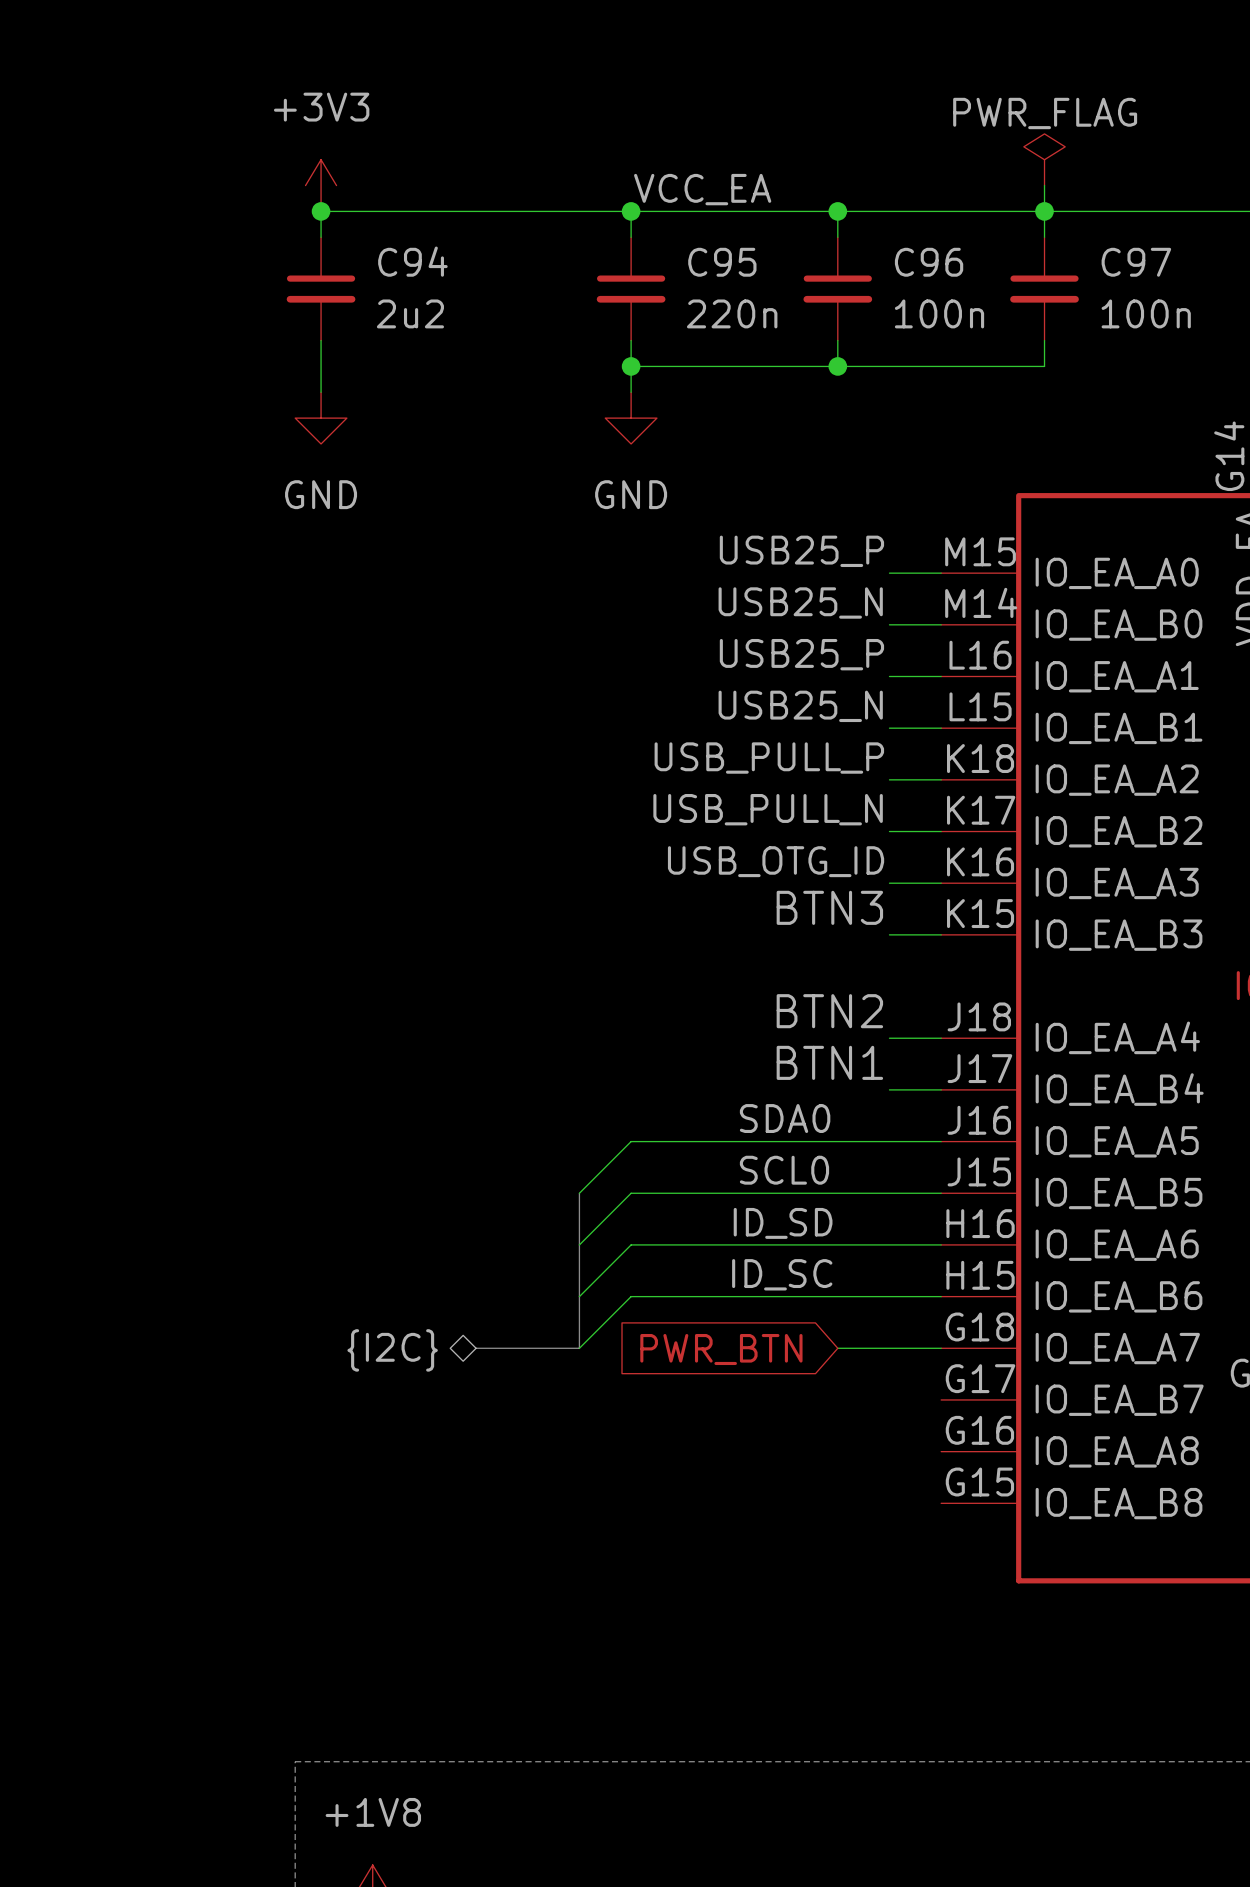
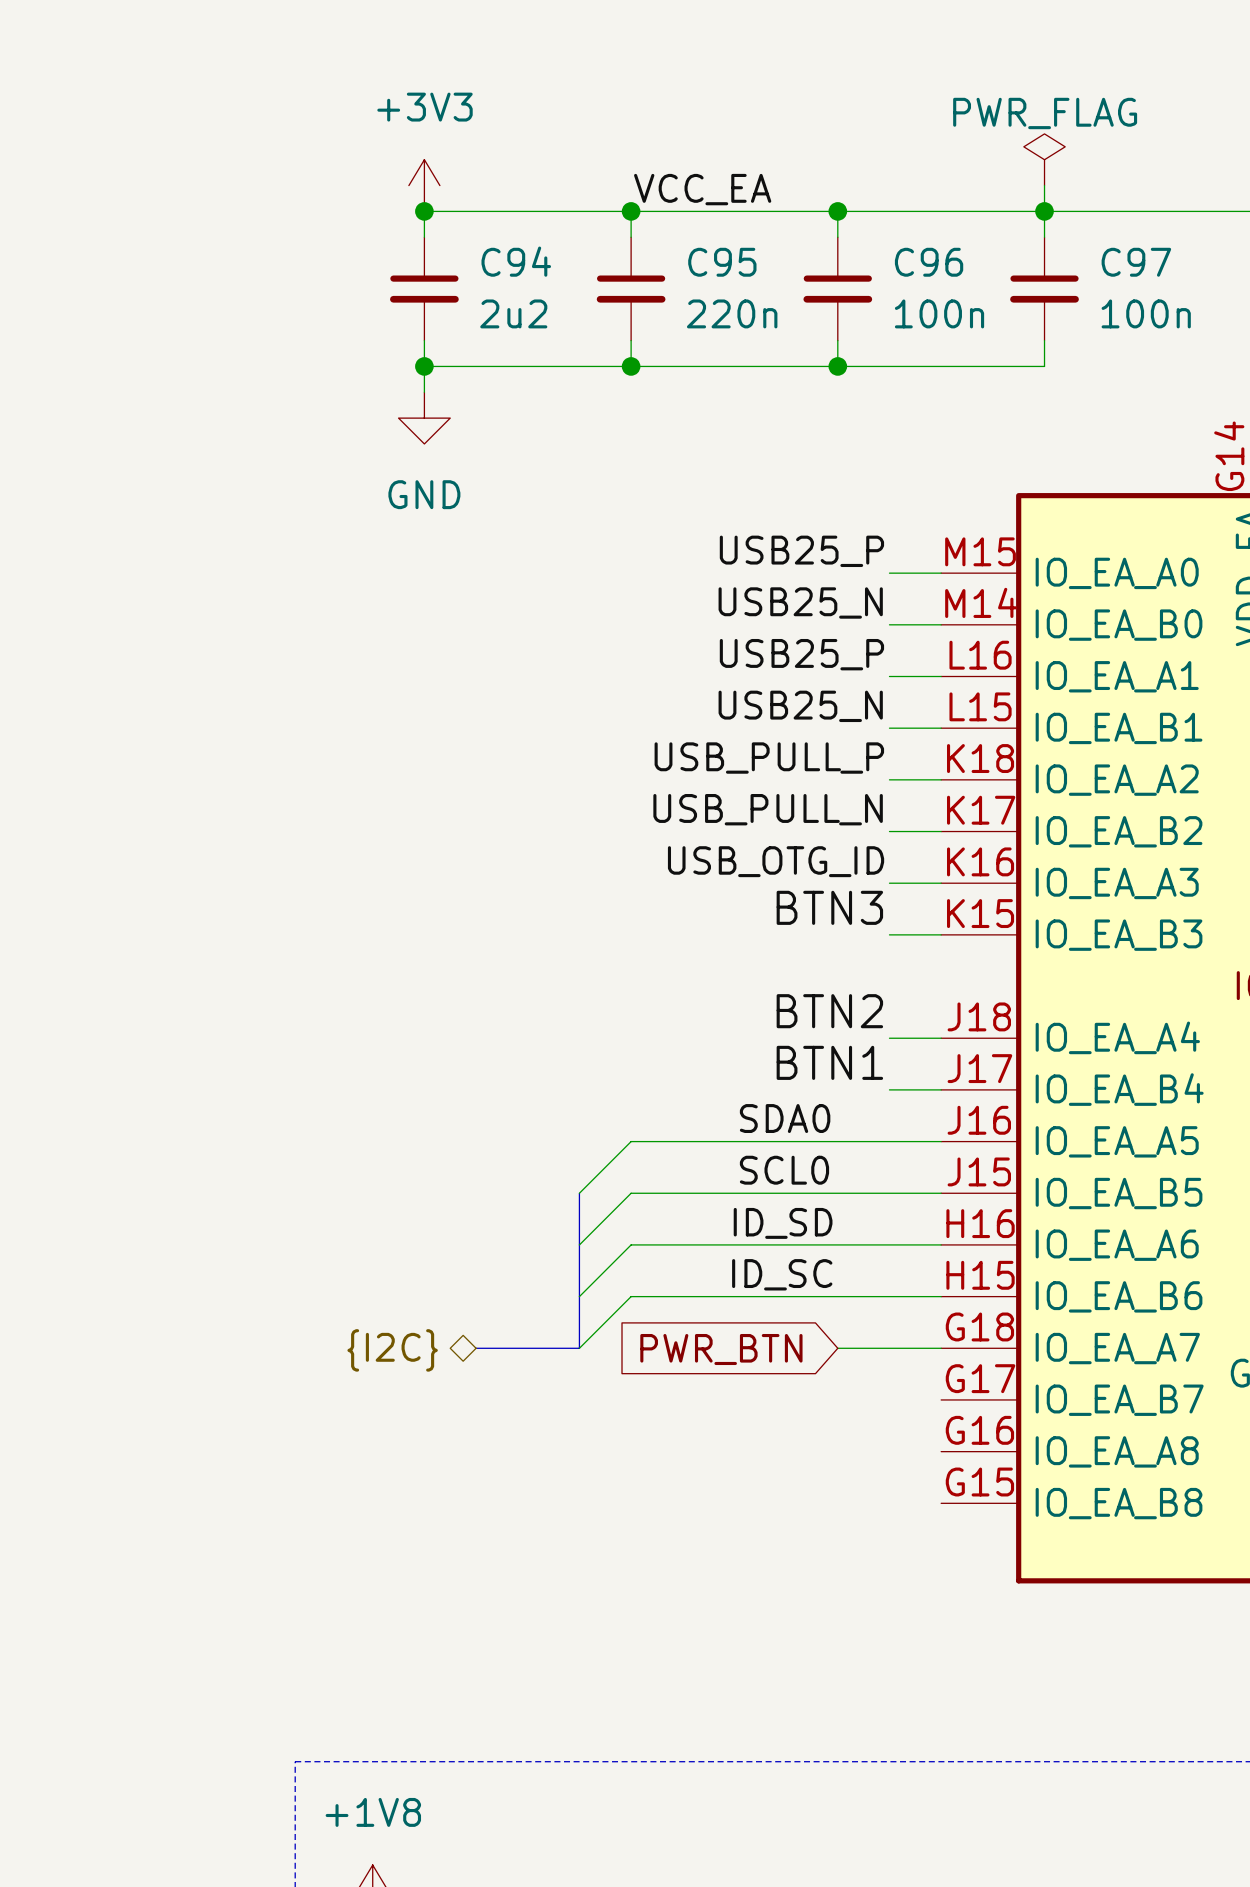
power symbol position: +3V3 (321, 185) -> +3V3 (424, 185)
junction: (321, 211) -> none
wire: (424, 211) (321, 211) (321, 237) -> (424, 211) (424, 237)
junction: none -> (424, 211)
C94 position: (321, 288) -> (424, 288)
wire: (321, 340) (321, 392) -> (424, 340) (424, 392)
junction: none -> (424, 366)
wire: (631, 366) (631, 392) -> (631, 366) (424, 366)
power symbol: GND (321, 418) -> none
power symbol: none -> GND (424, 418)
power symbol: GND (631, 418) -> none

